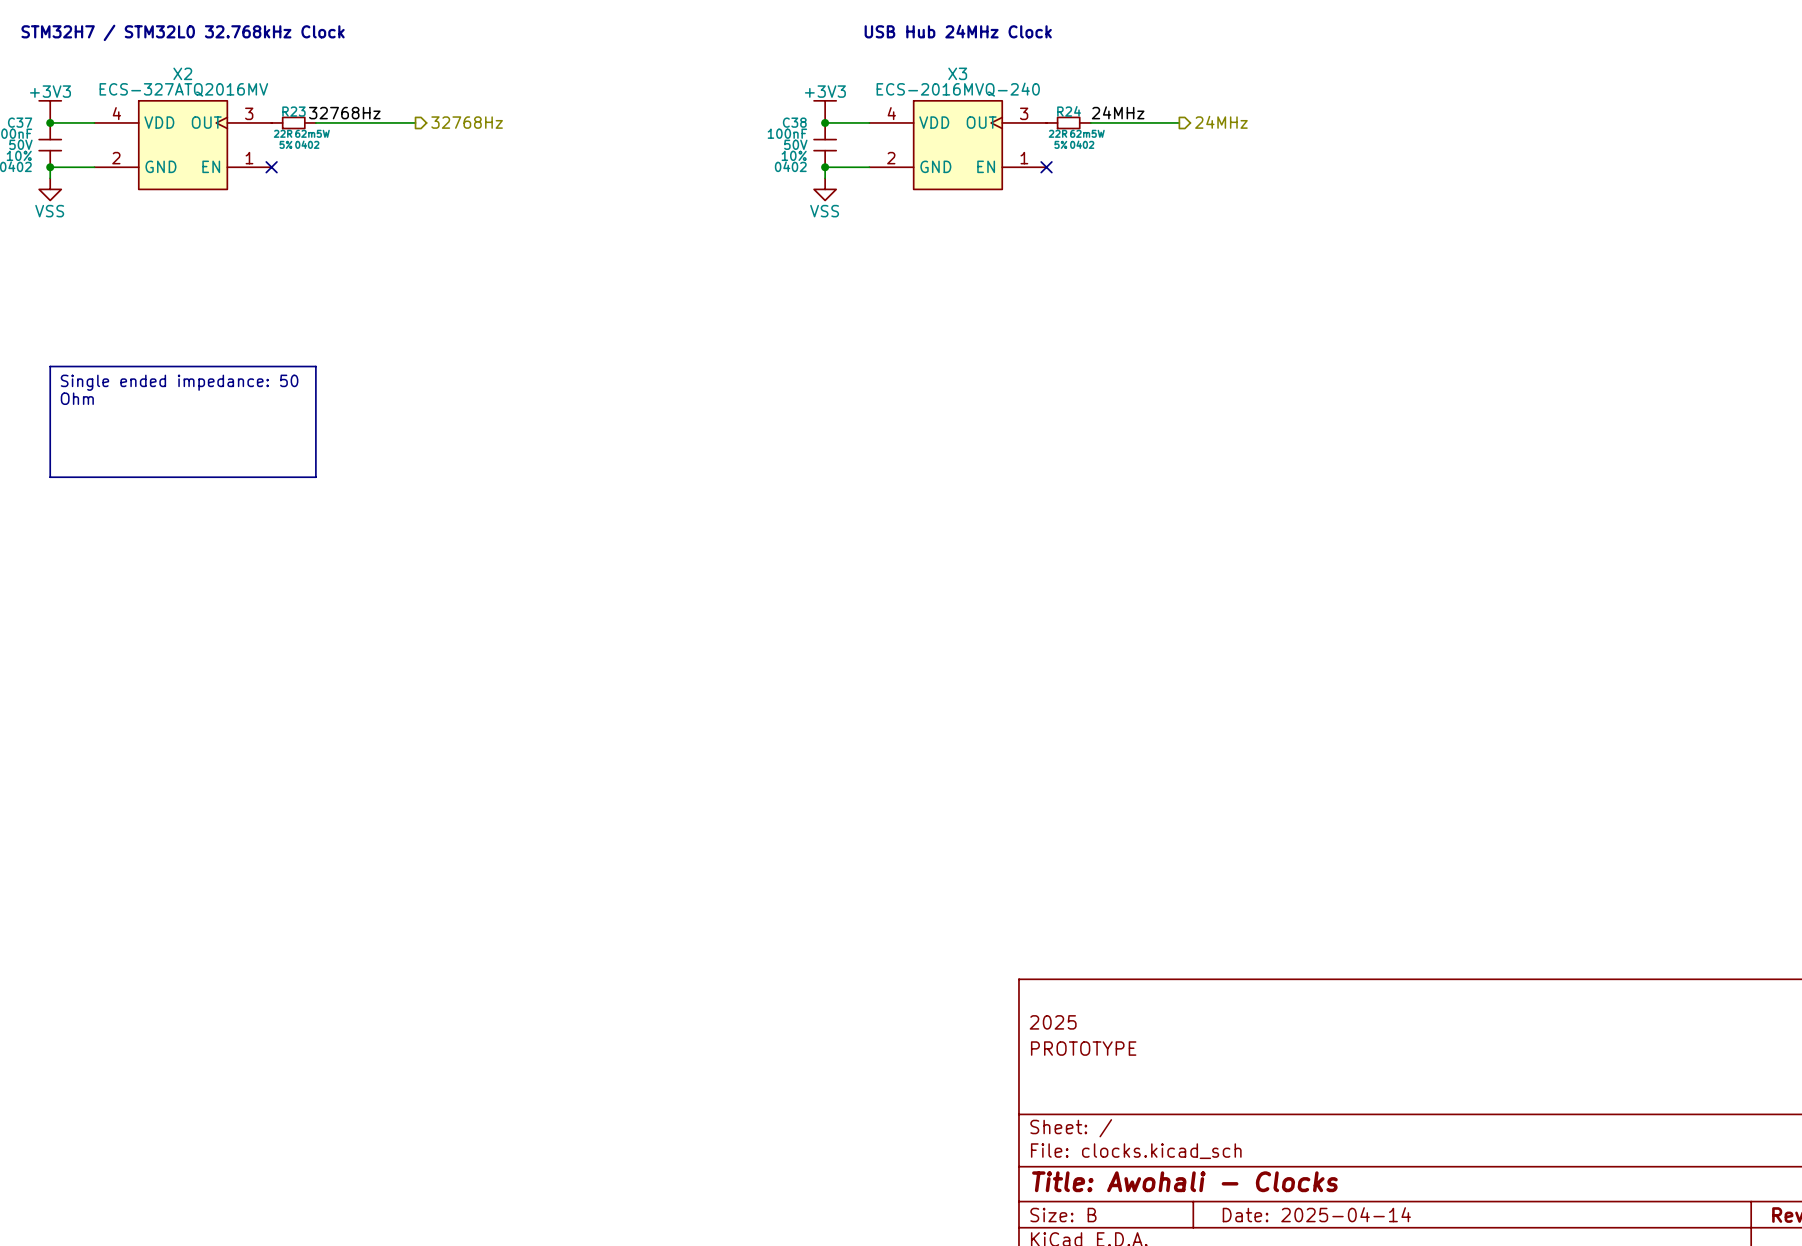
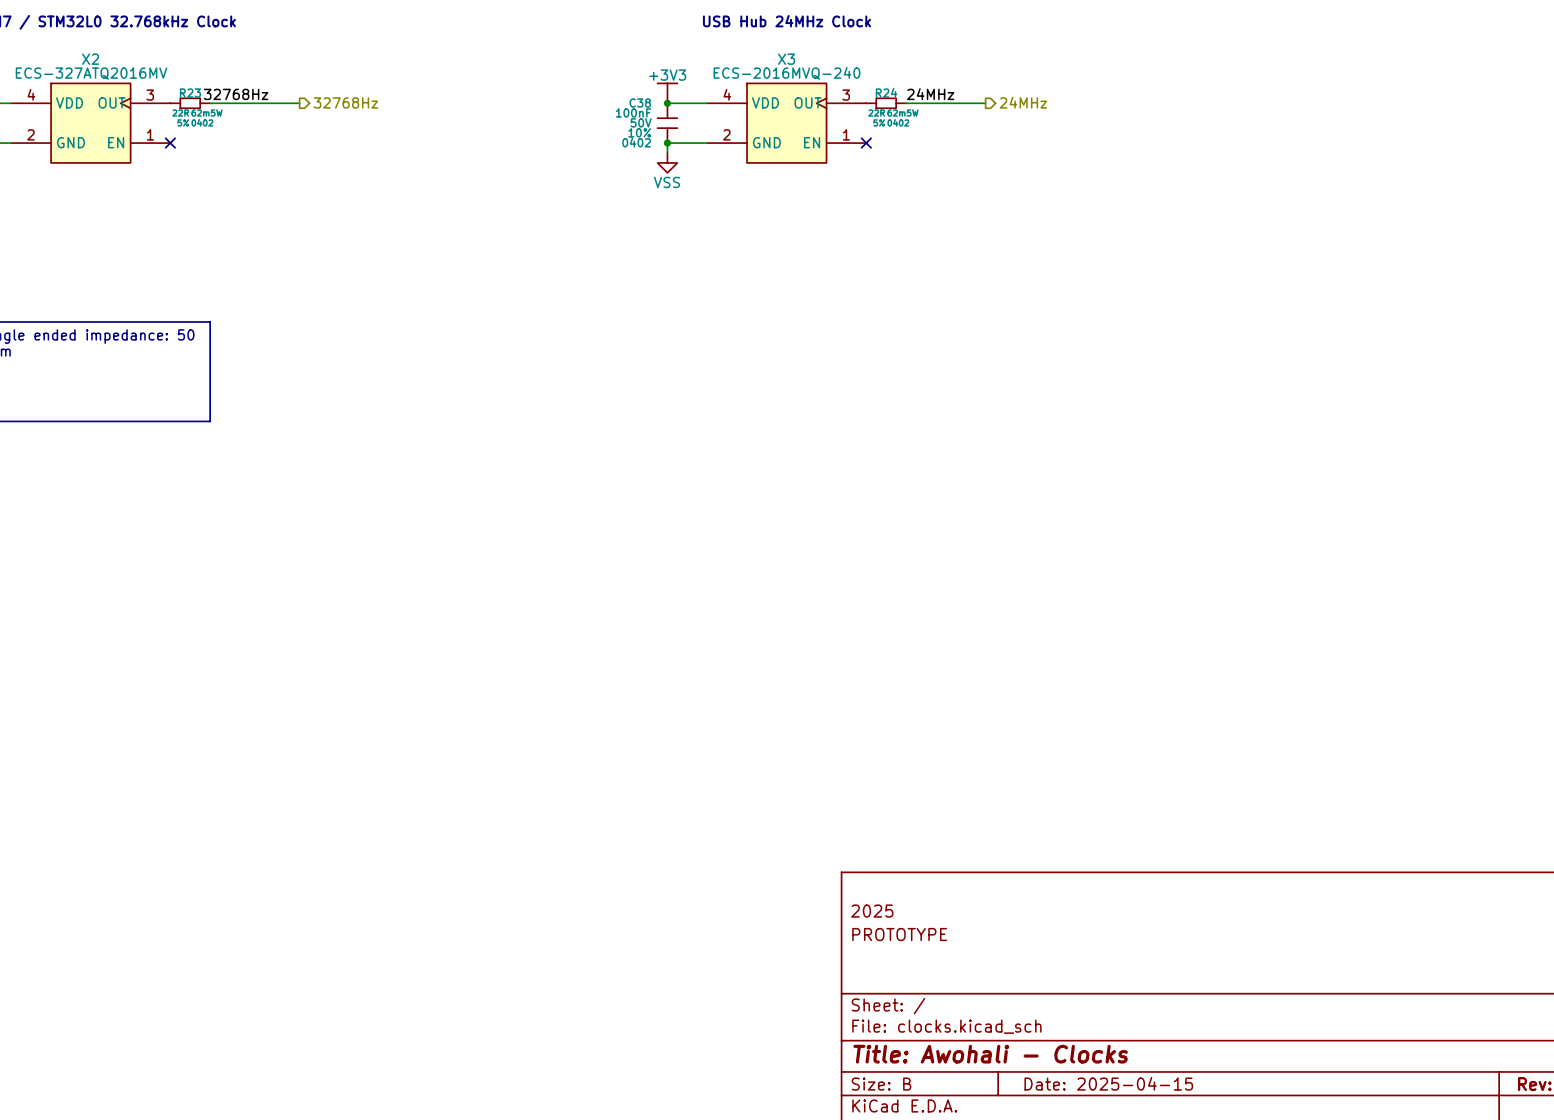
title block: Date: 2025-04-14 (1316, 1214) -> Date: 2025-04-15 (1108, 1083)

